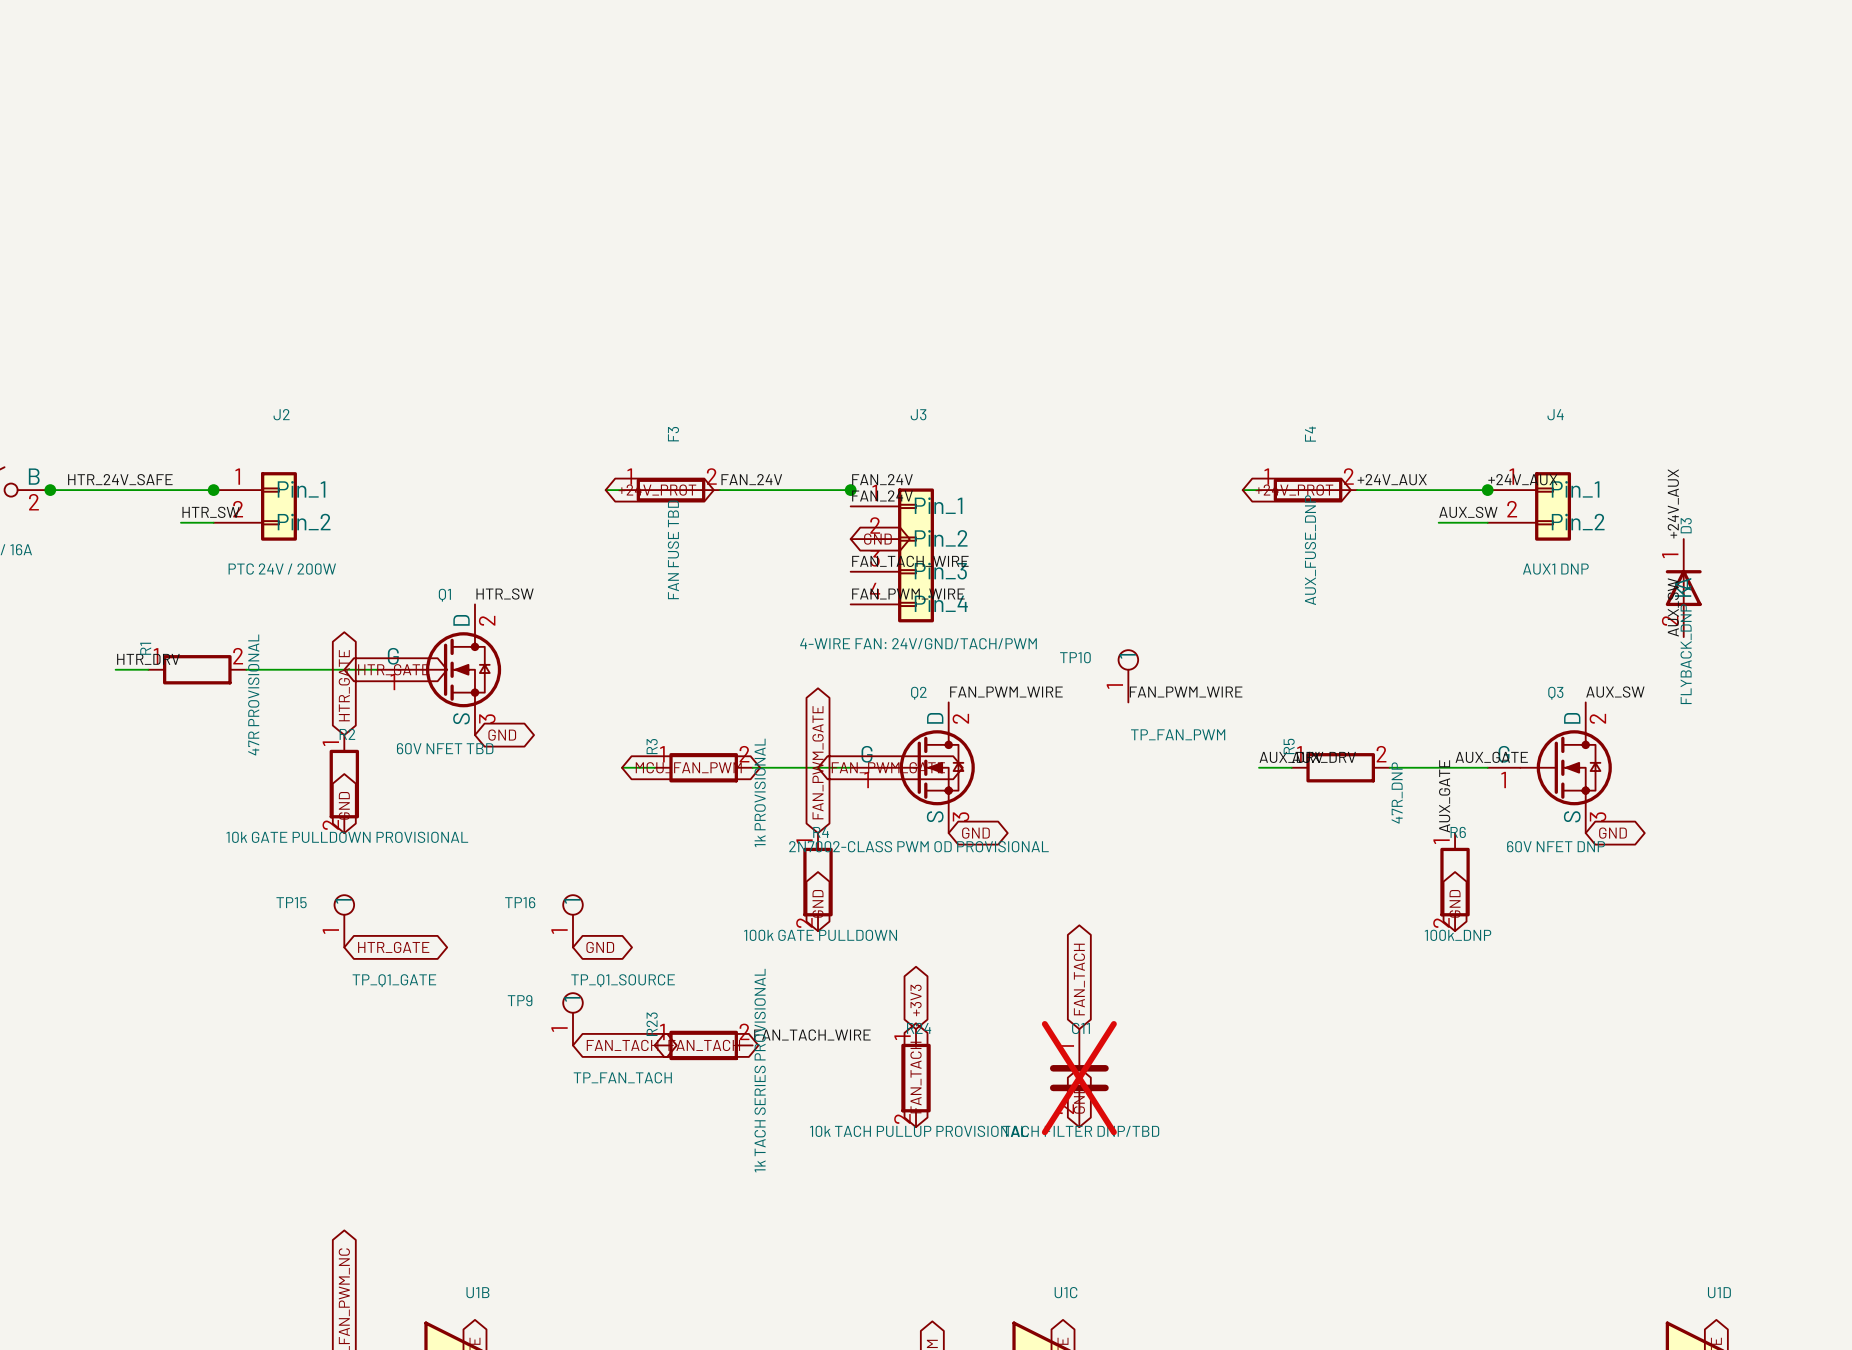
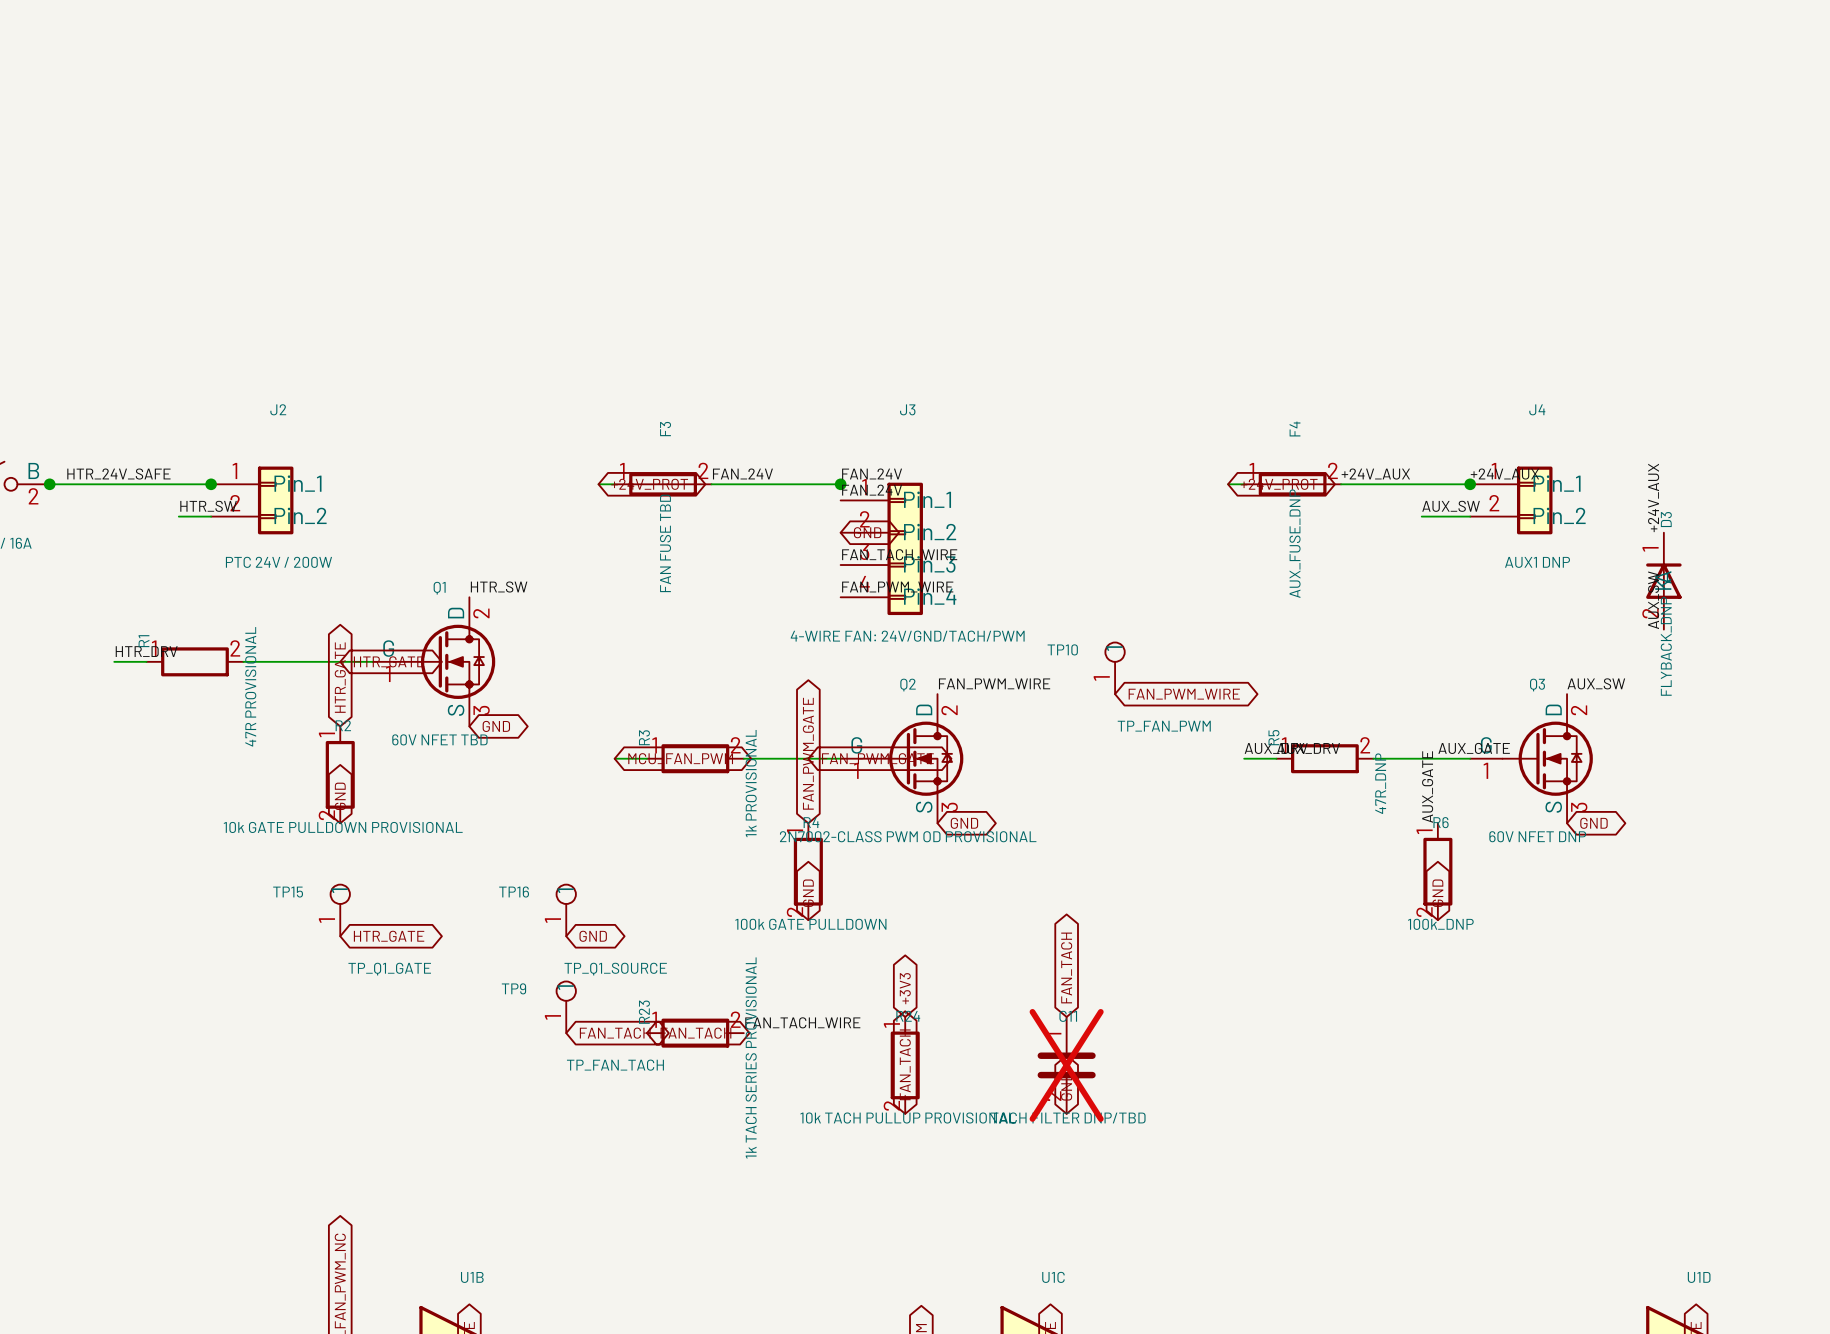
label: FAN_PWM_WIRE (1186, 692) -> none
global label: none -> FAN_PWM_WIRE (1184, 694)

